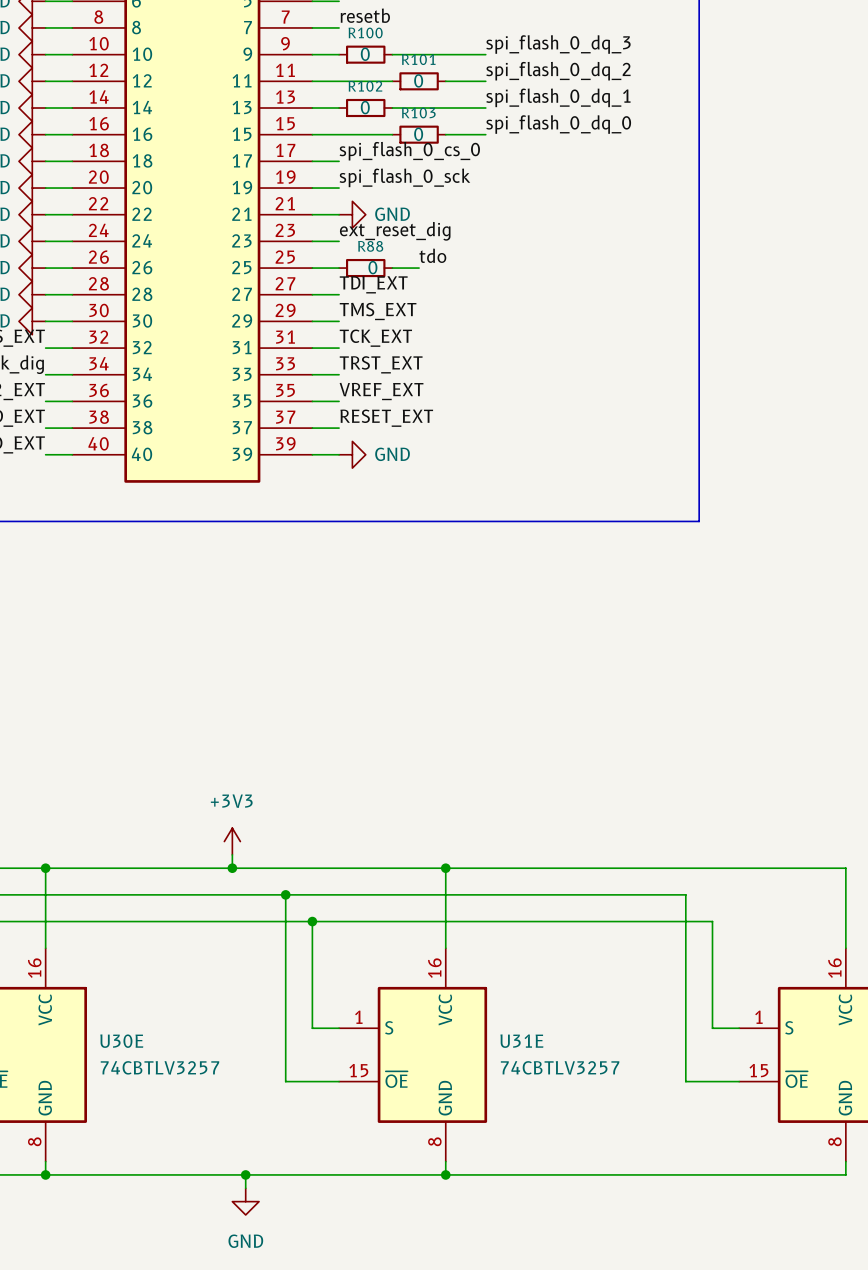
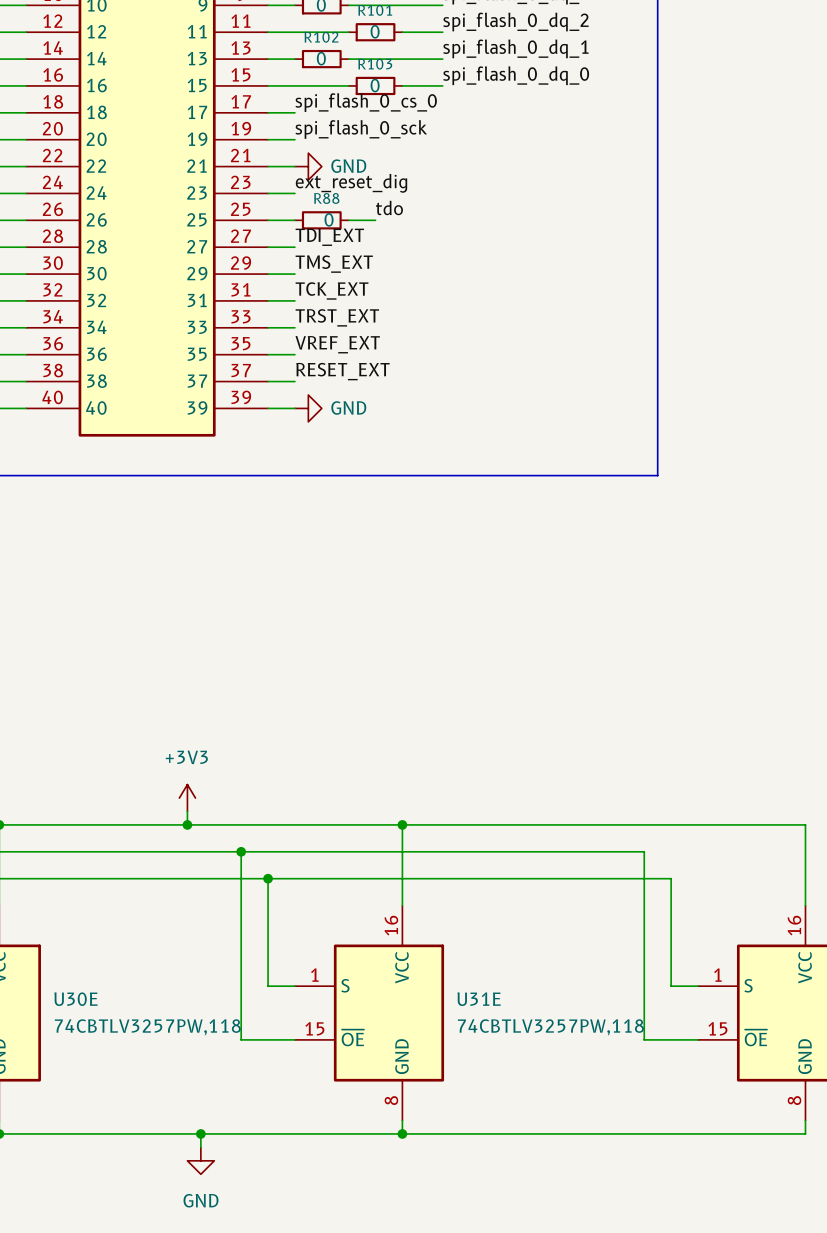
U30E value: 74CBTLV3257 (159, 1067) -> 74CBTLV3257PW,118 (147, 1027)
U31E value: 74CBTLV3257 (560, 1067) -> 74CBTLV3257PW,118 (550, 1027)

